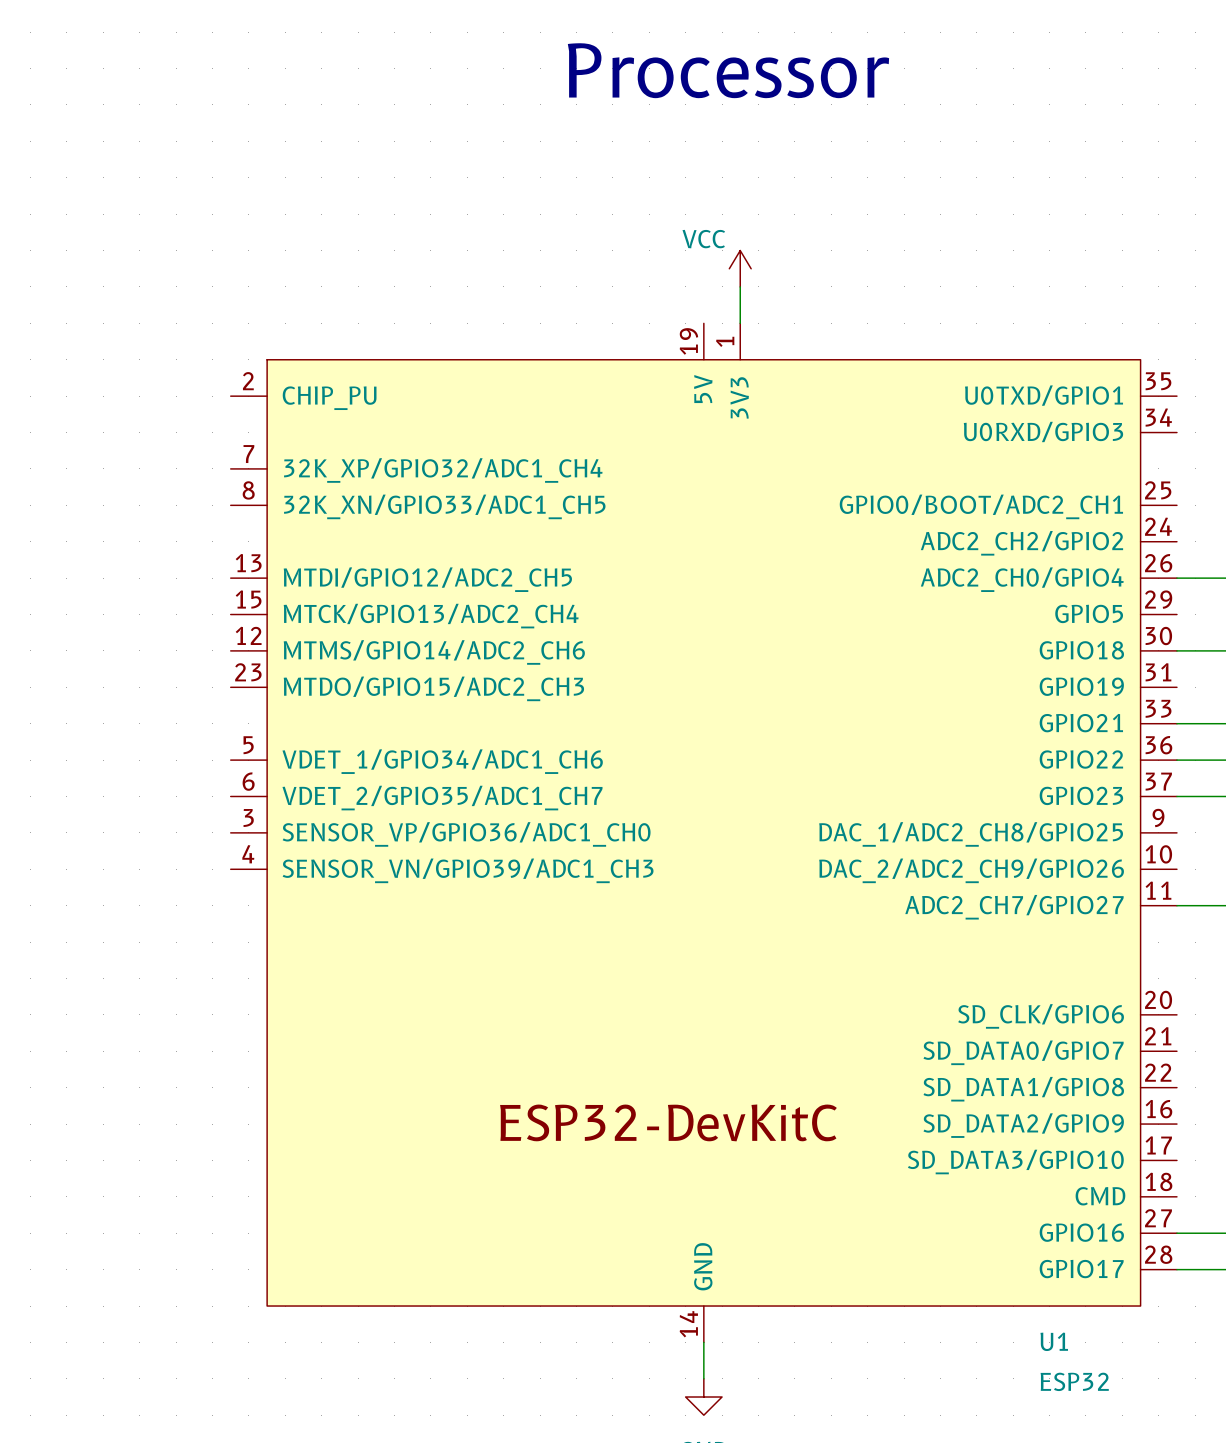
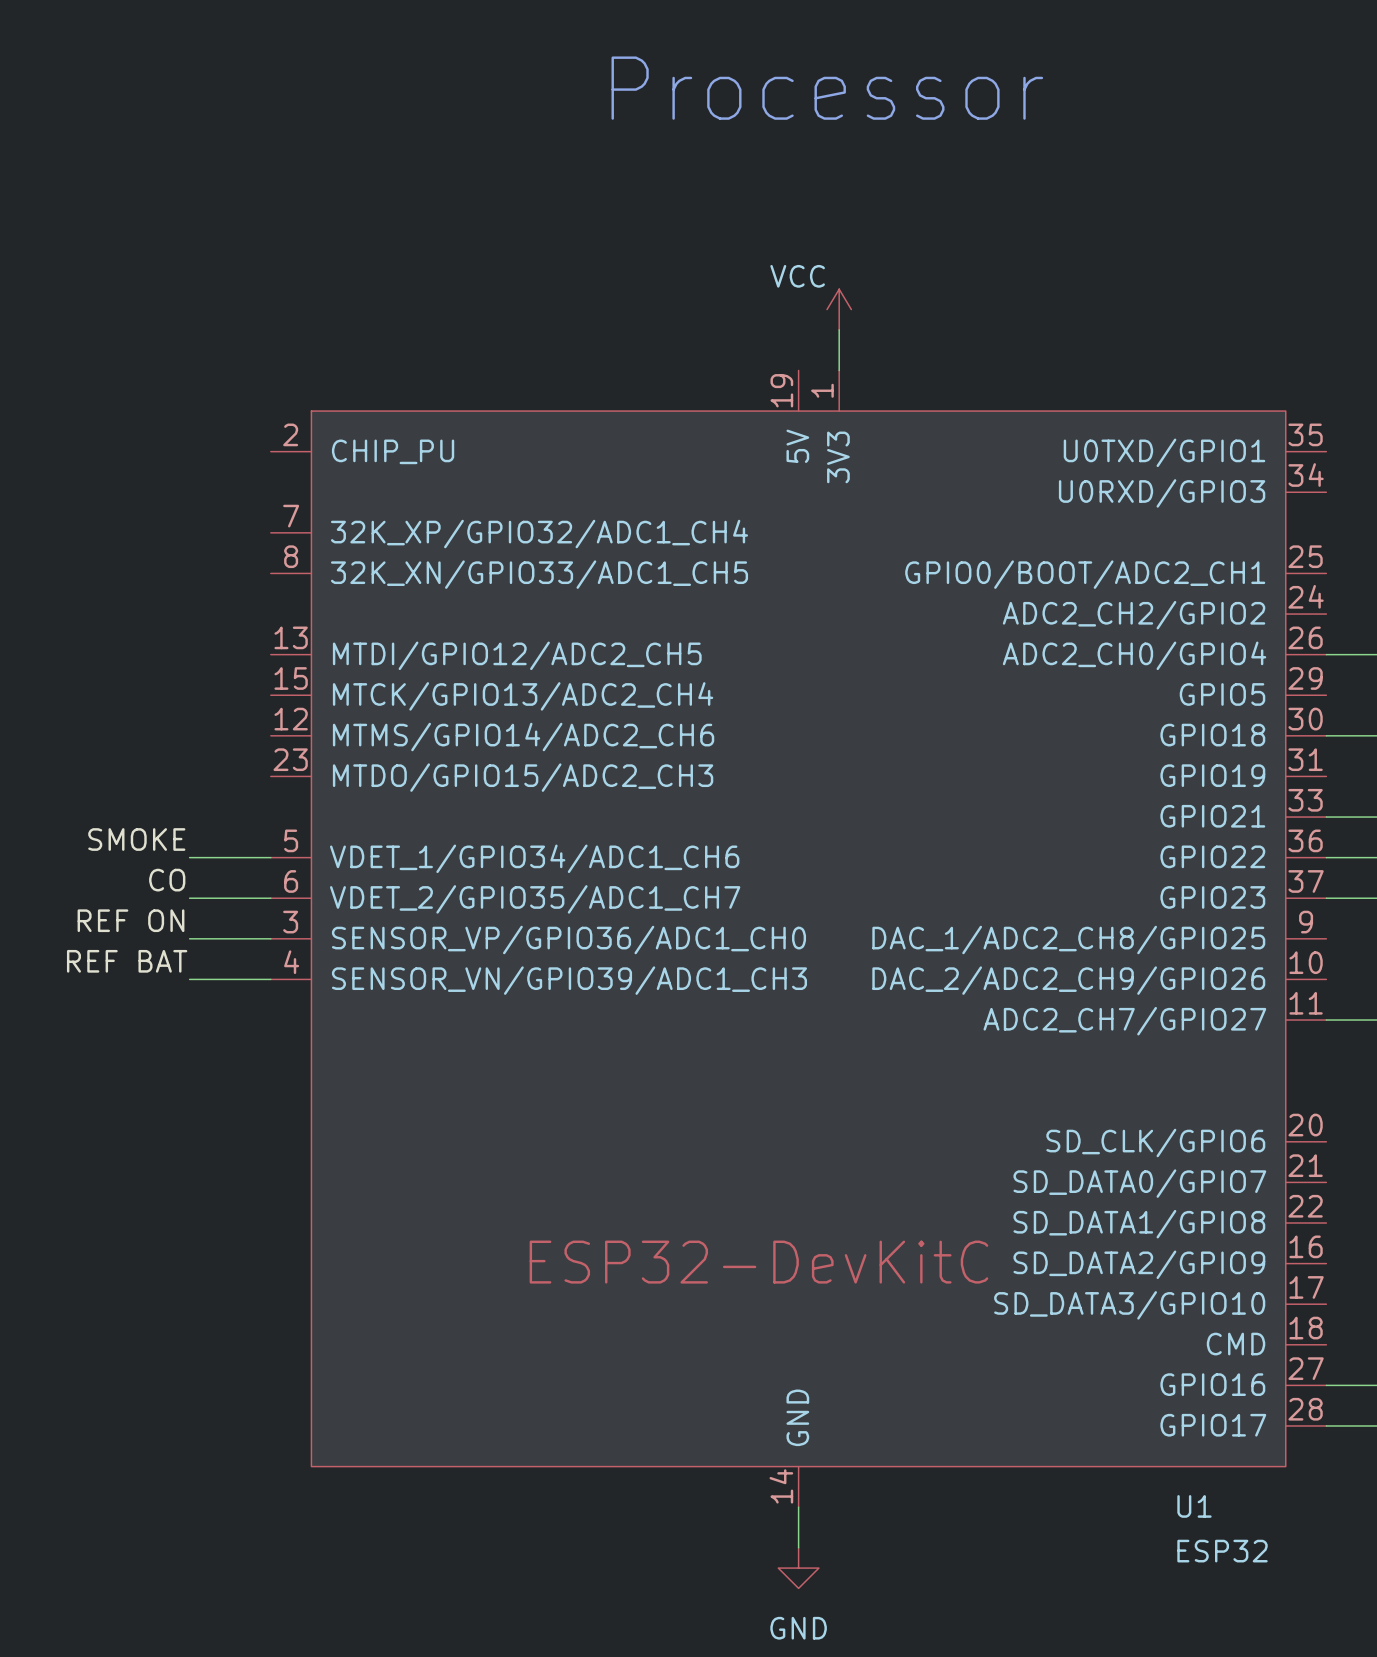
label: none -> SMOKE (136, 839)
wire: none -> (189, 857) (270, 857)
label: none -> CO (167, 880)
wire: none -> (189, 898) (270, 898)
label: none -> REF ON (131, 920)
wire: none -> (189, 938) (270, 938)
label: none -> REF BAT (127, 961)
wire: none -> (189, 979) (270, 979)

